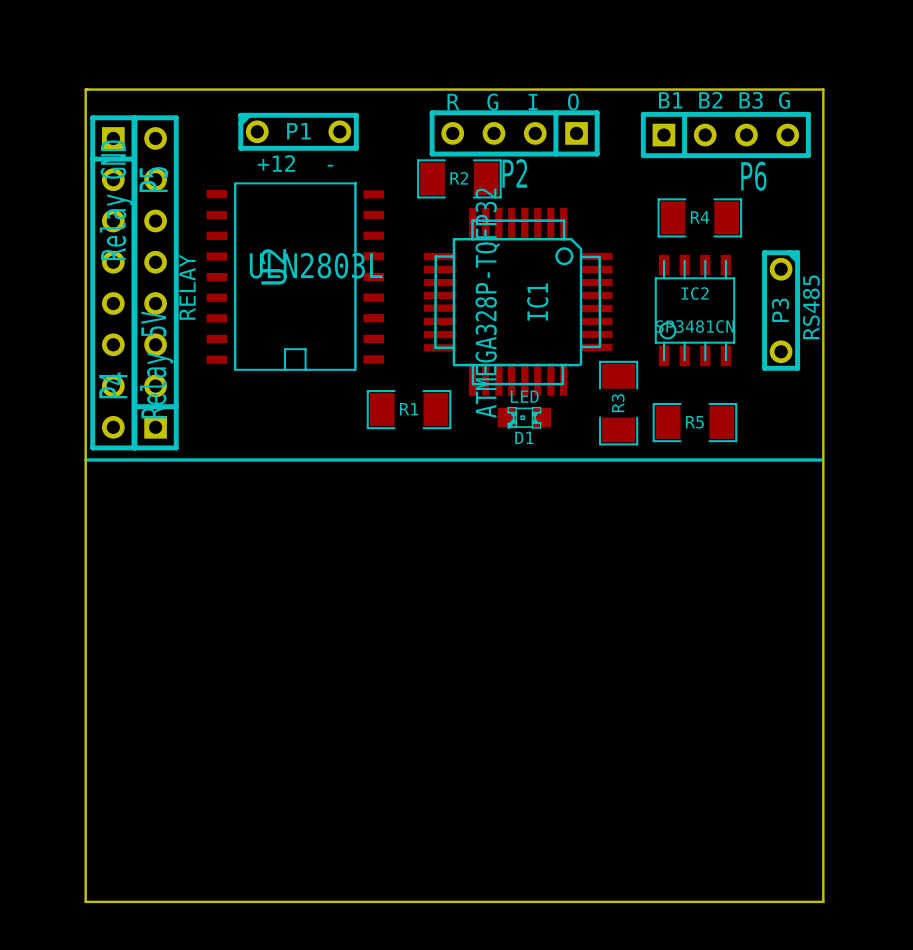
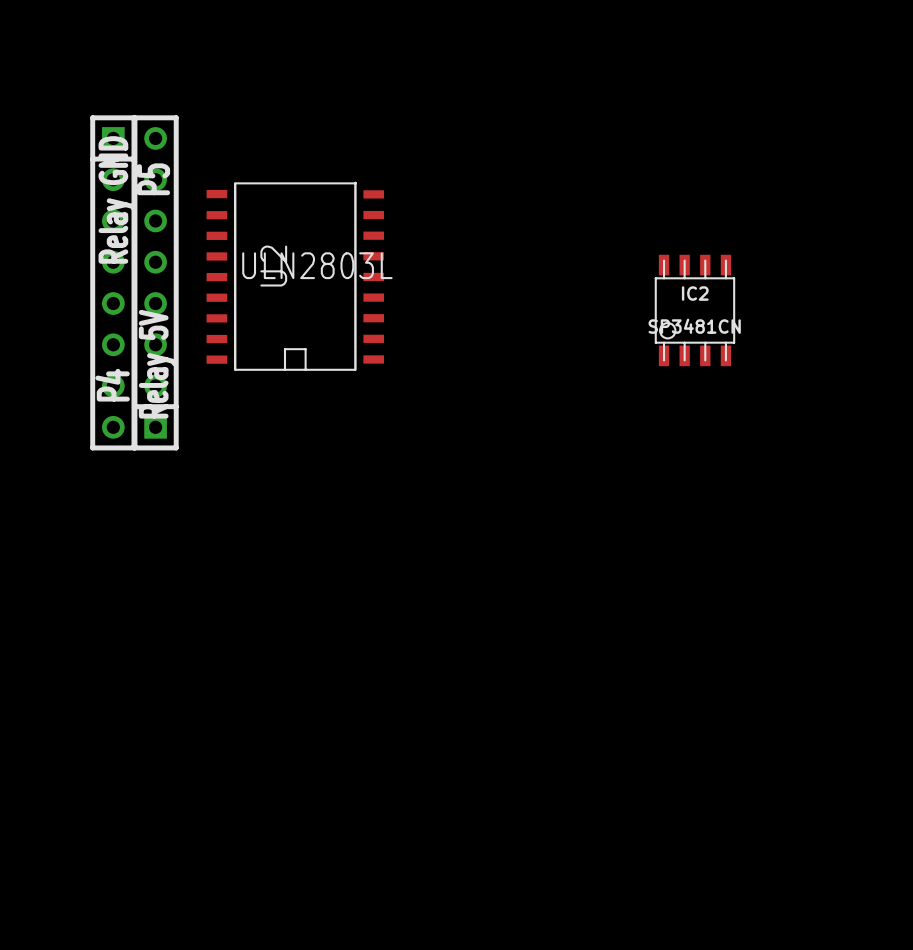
board edge: (85, 89) (823, 89) (823, 901) (85, 901) (85, 89) -> none
text: B1 B2 B3 G (724, 100) -> none
text: R G I O (513, 101) -> none
P1: (298, 131) -> none
P2: (514, 133) -> none
P6: (725, 135) -> none
text: +12 - (295, 163) -> none
R2: (459, 178) -> none
R4: (699, 217) -> none
text: RELAY (187, 287) -> none
IC1: ATMEGA328P-TQFP32 (518, 301) -> none
text: RS485 (811, 307) -> none
P3: (781, 310) -> none
R3: (618, 403) -> none
R1: (409, 409) -> none
D1: LED (524, 417) -> none
R5: (694, 422) -> none
line: (85, 459) (821, 459) -> none

